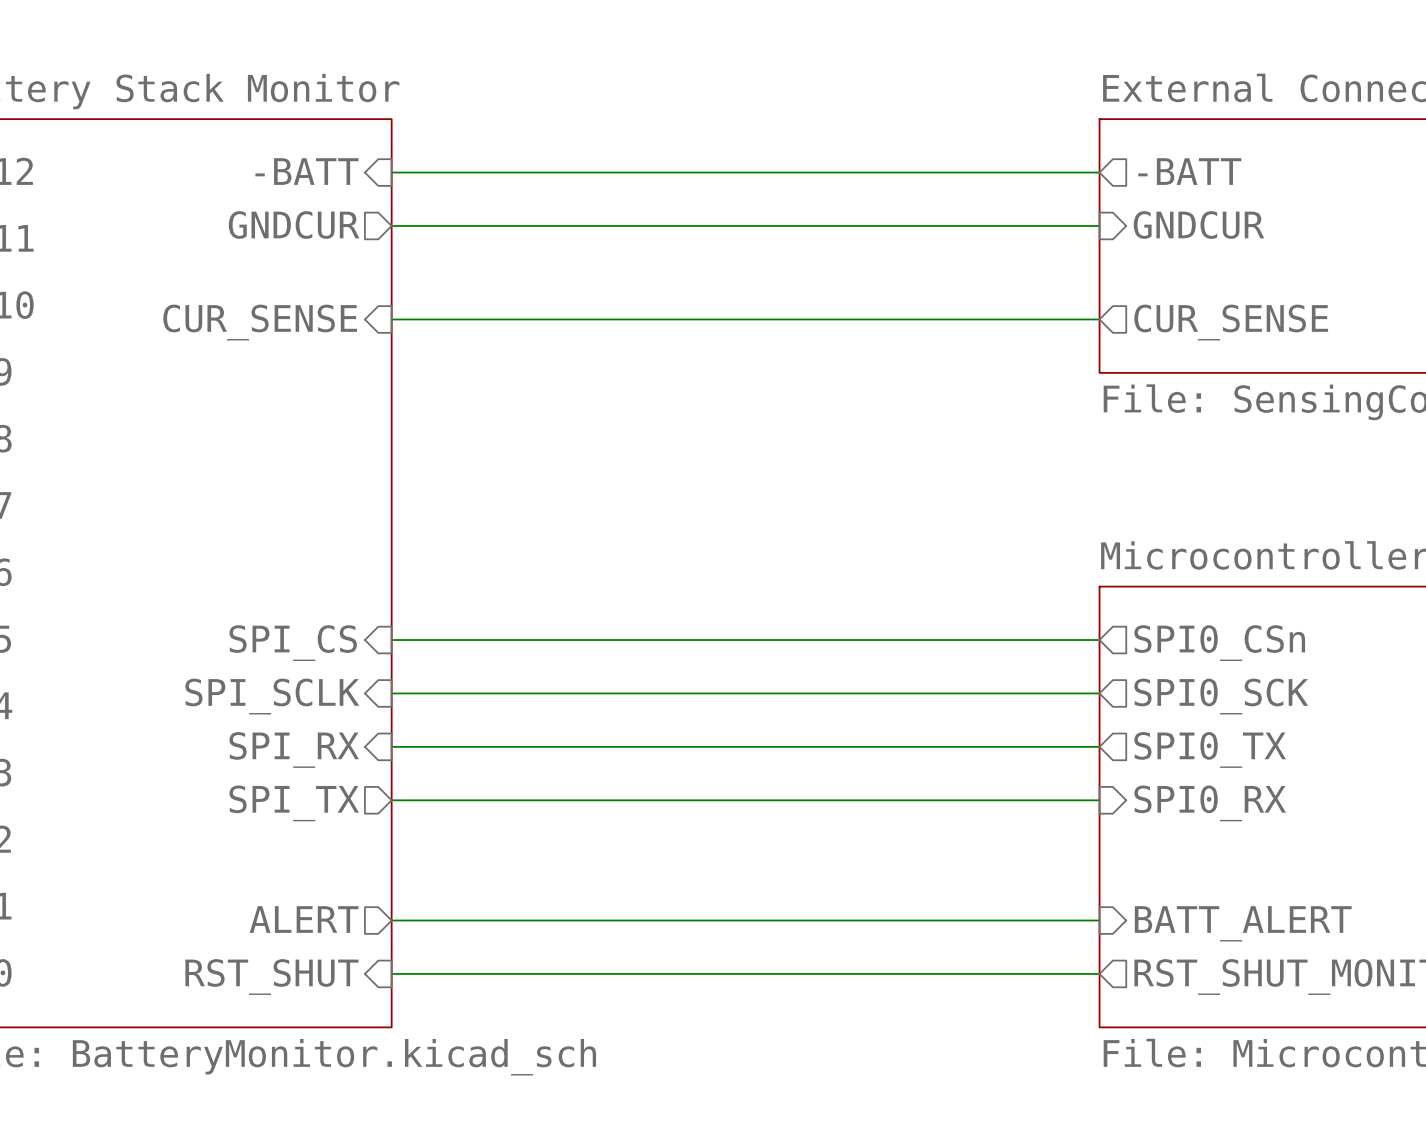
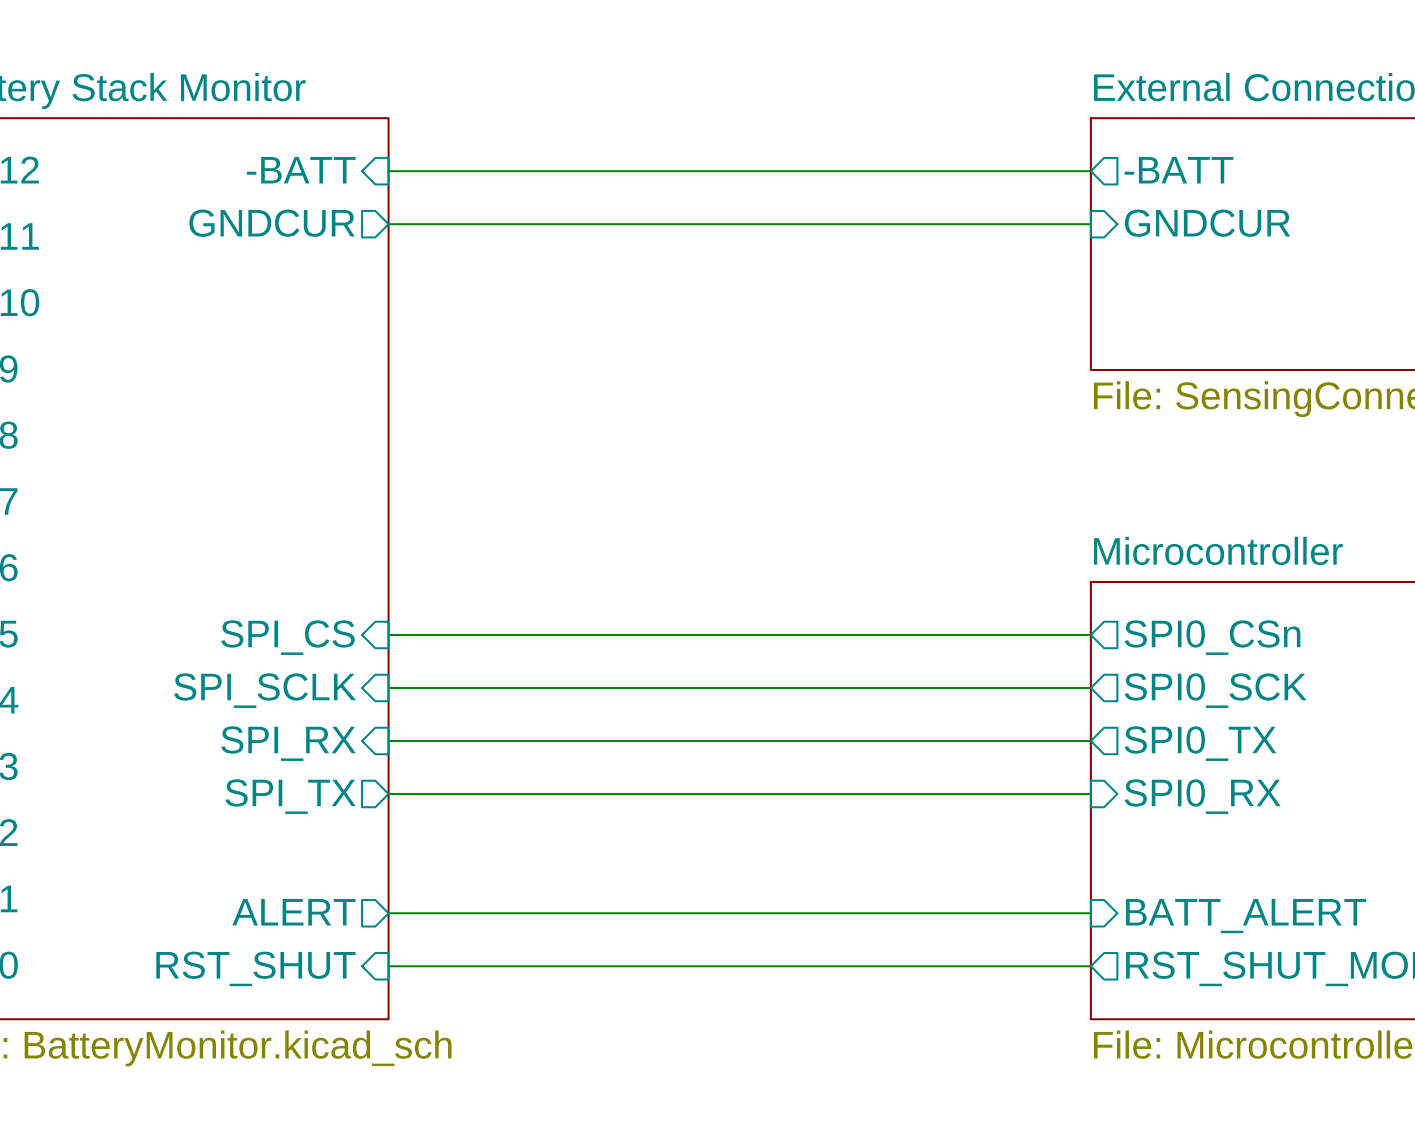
wire: (391, 319) (1099, 319) -> none
sheet pin: CUR_SENSE (260, 322) -> none
sheet pin: CUR_SENSE (1231, 322) -> none

